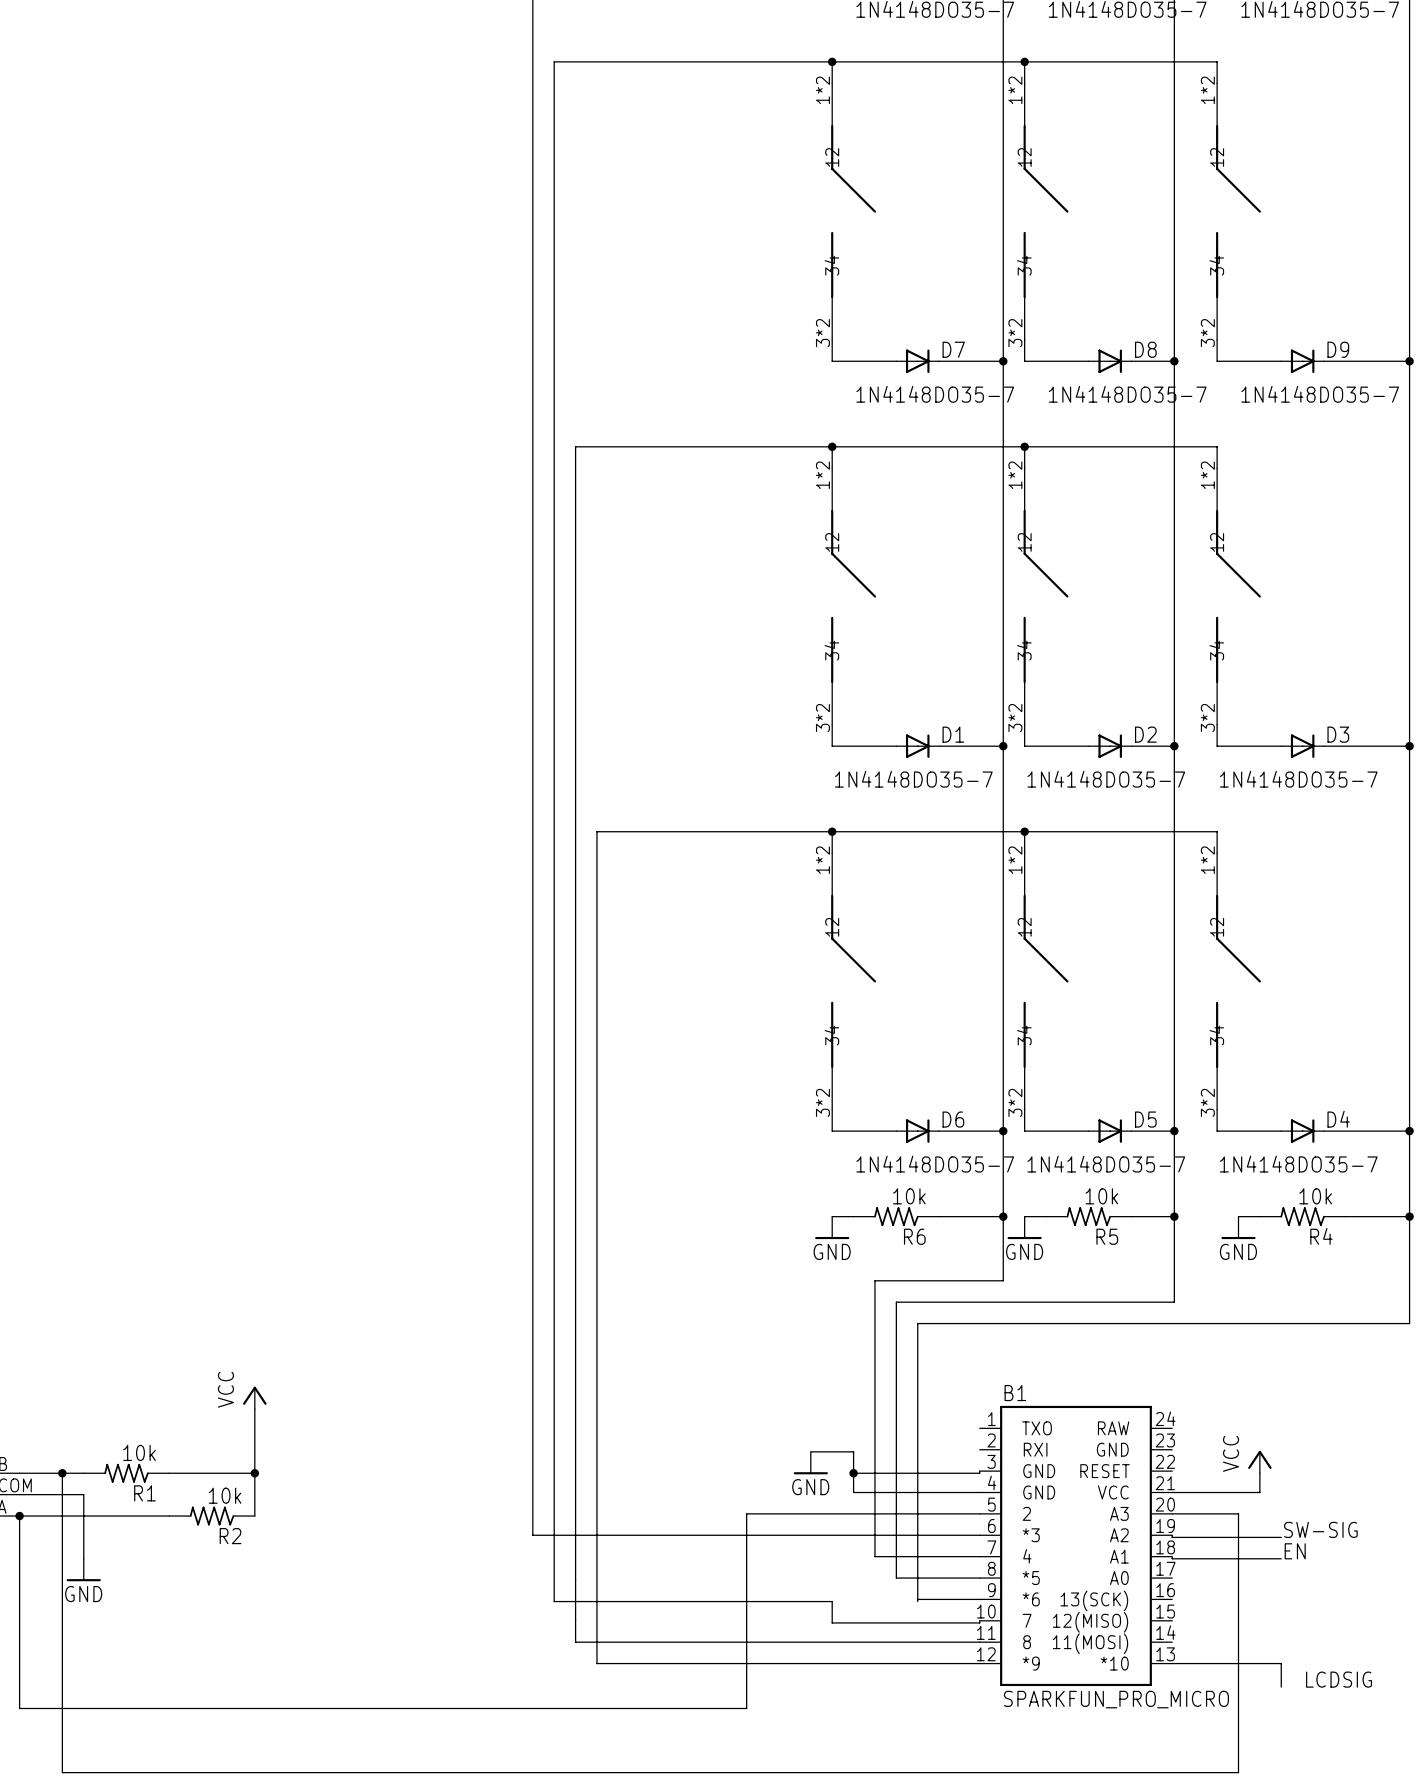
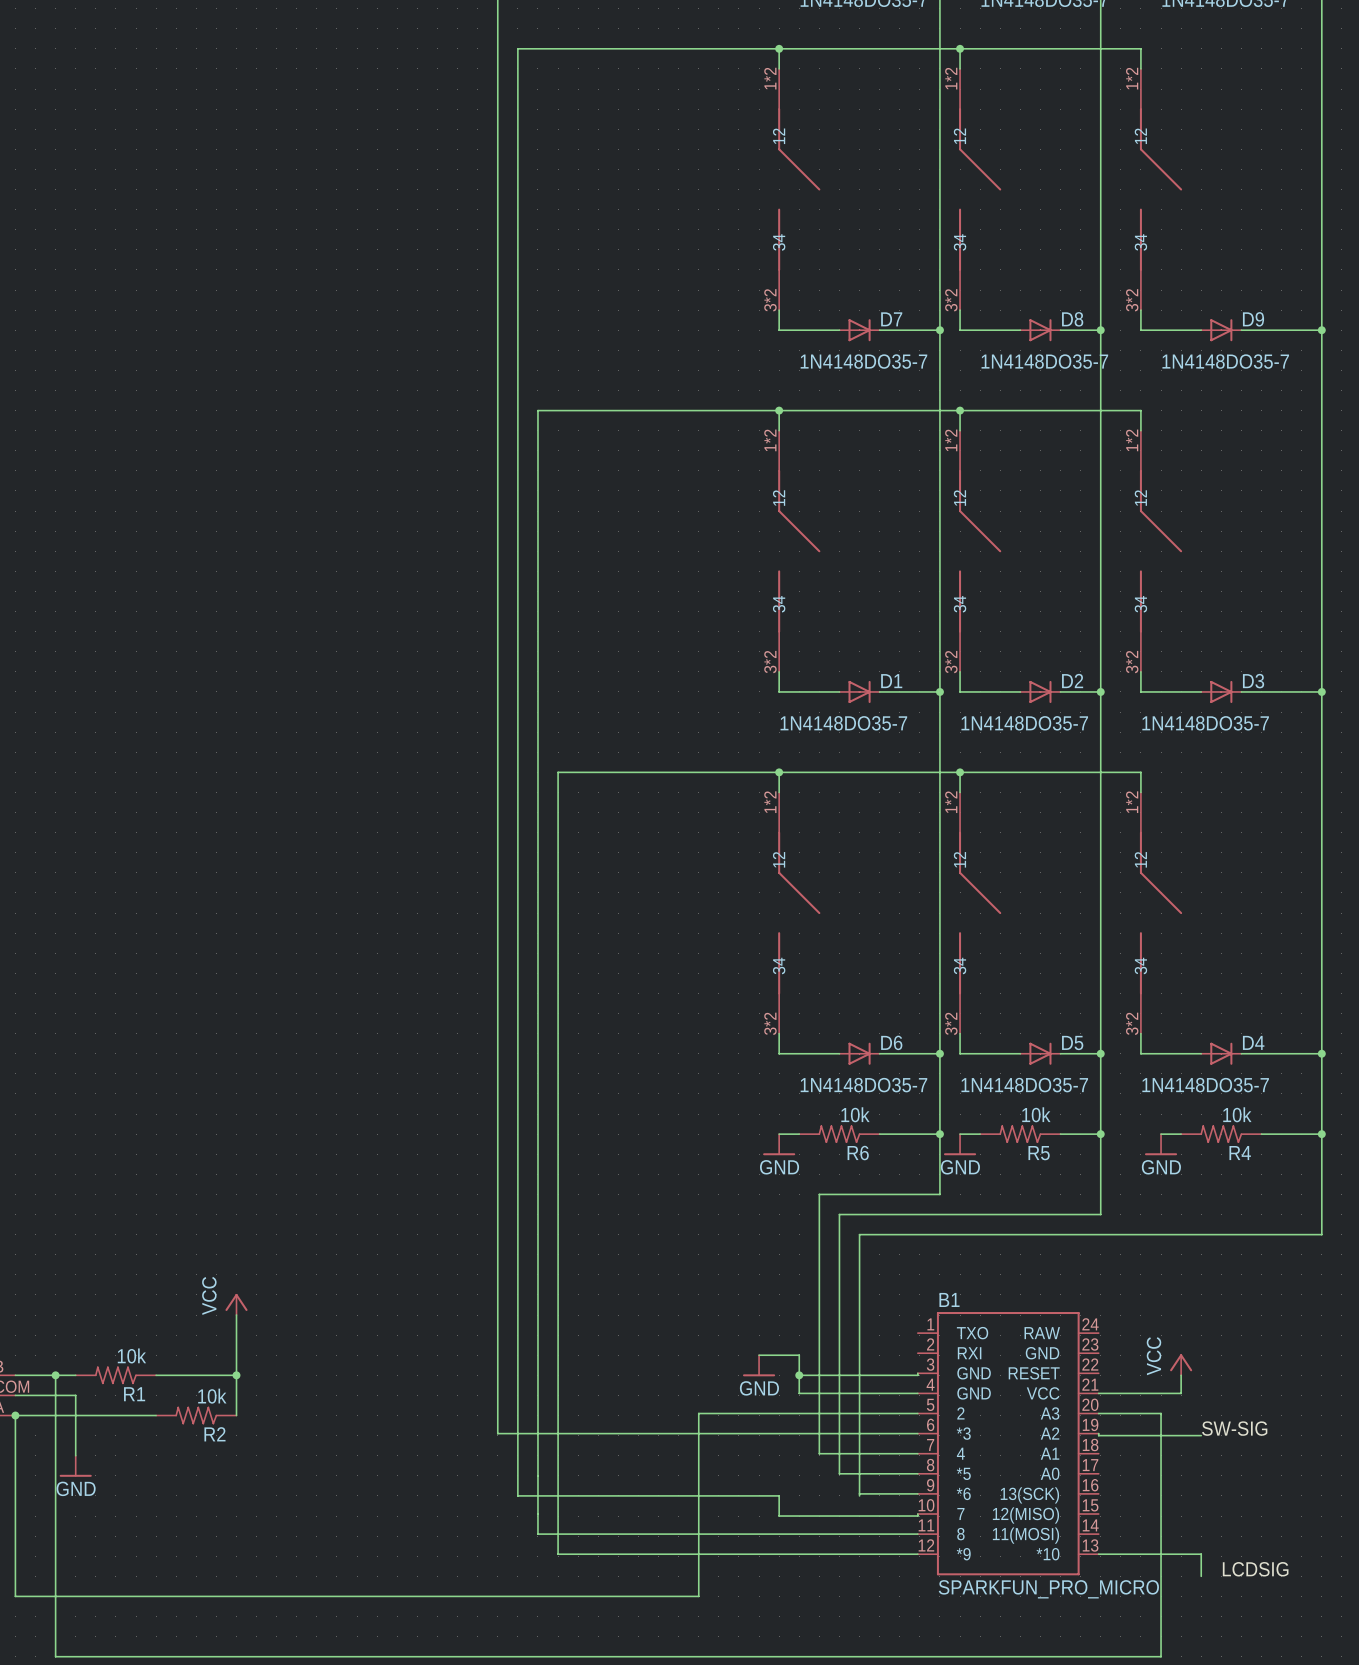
label: EN (1295, 1551) -> none
wire: (1172, 1556) (1172, 1558) (1281, 1558) -> none

